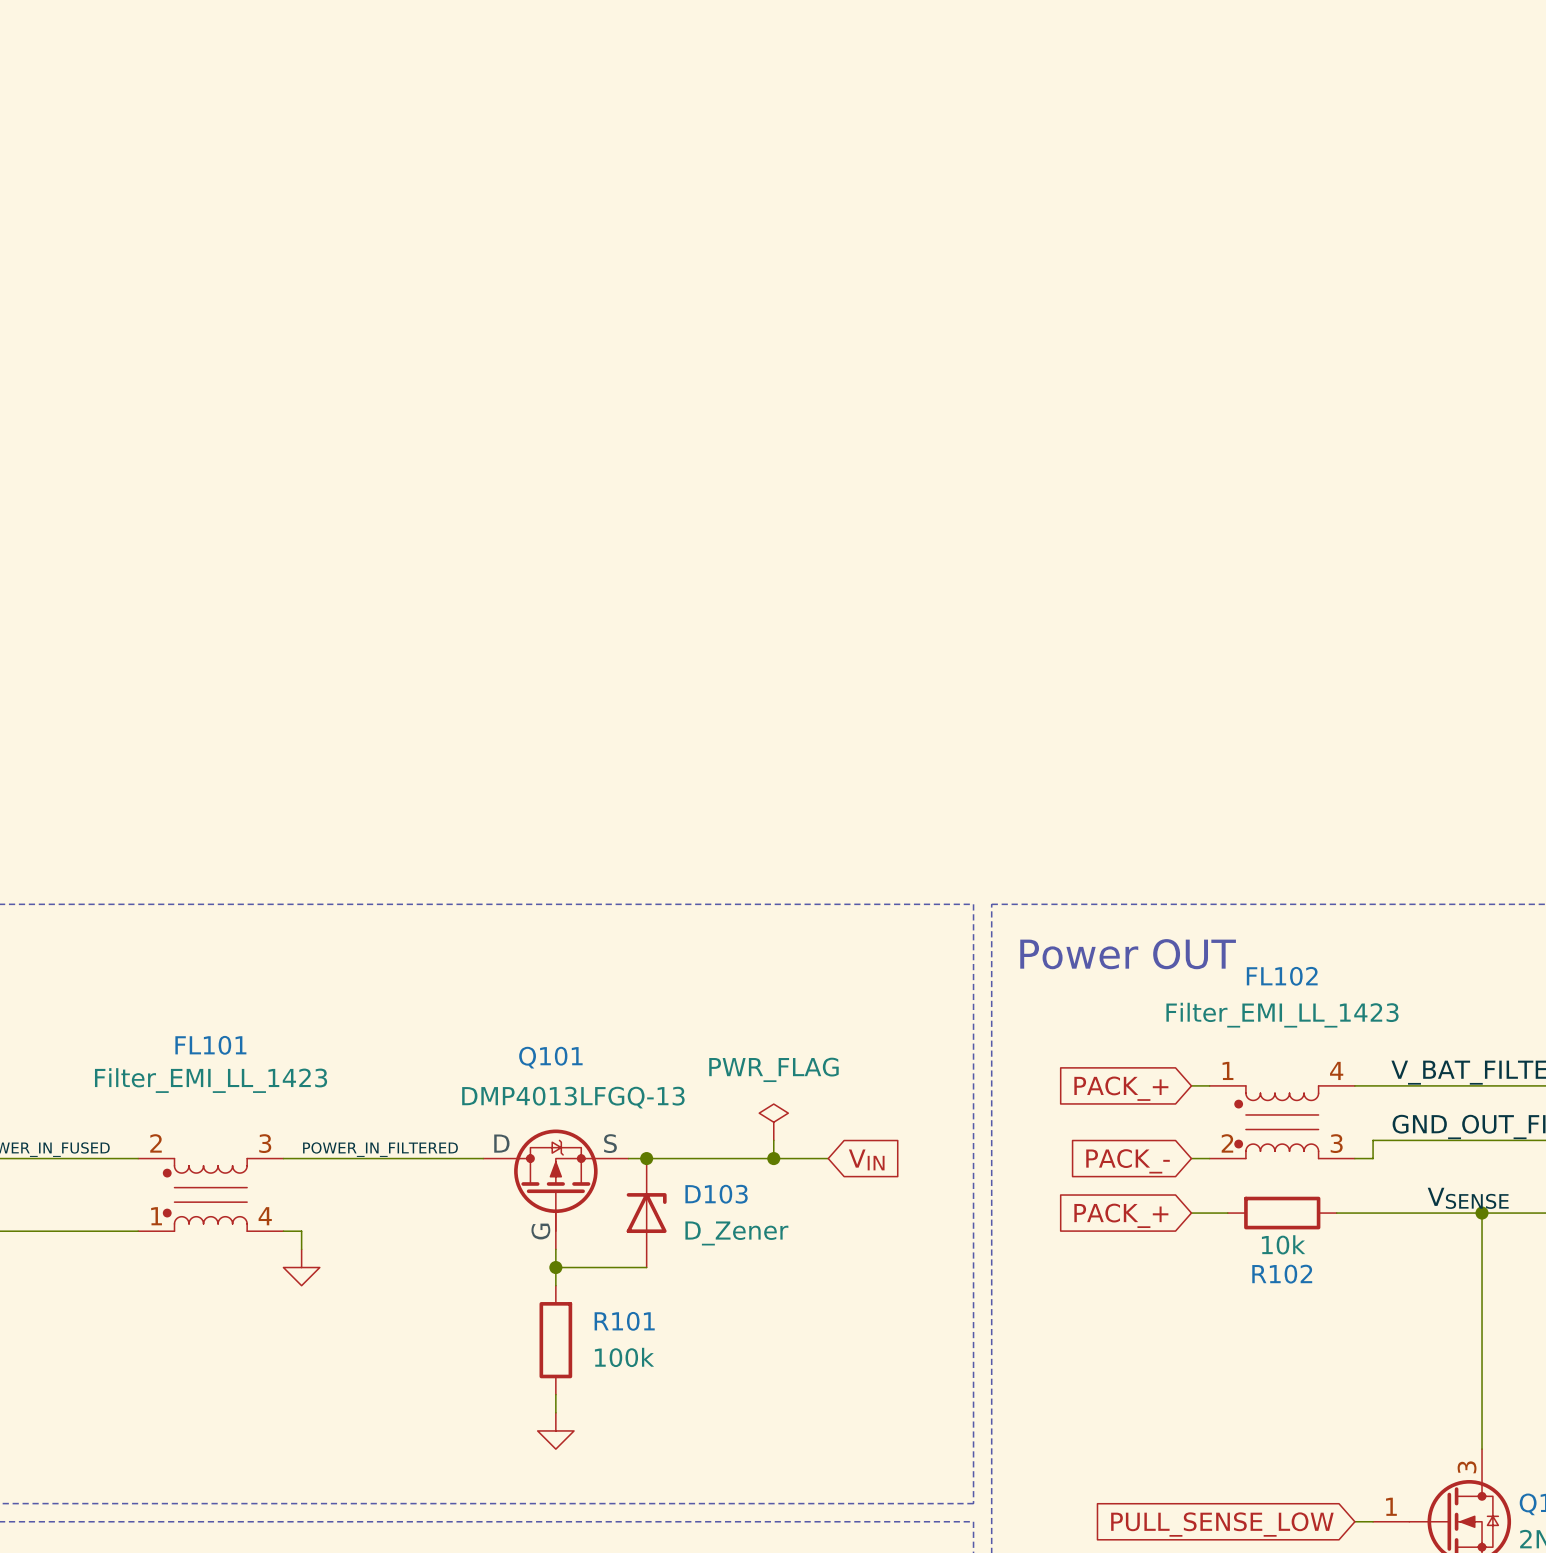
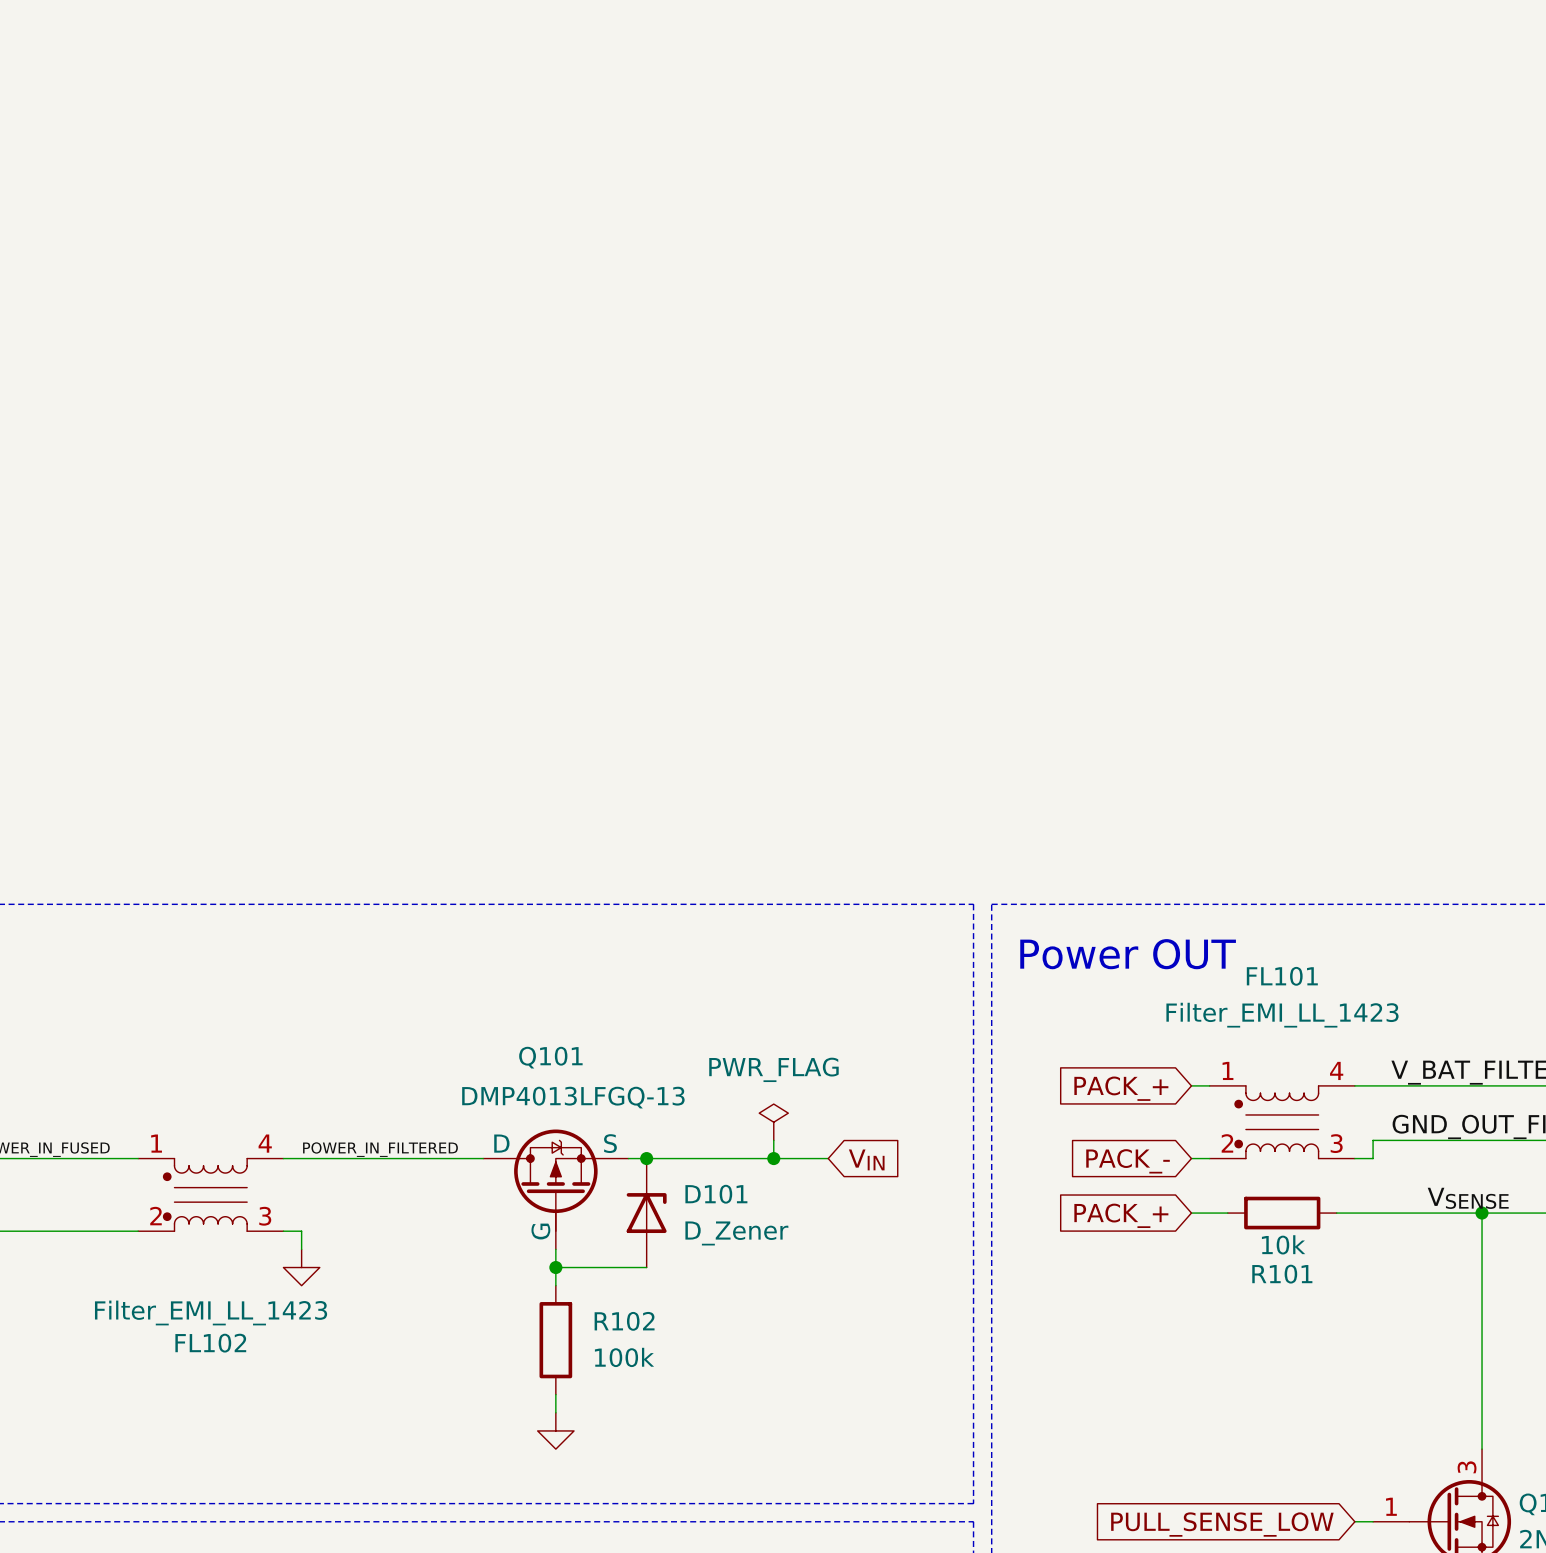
FL102 name: FL102 (1282, 976) -> FL101 (1282, 976)
FL101: Filter_EMI_LL_1423 (210, 1194) -> none
FL102: none -> Filter_EMI_LL_1423 (210, 1194)
D103 name: D103 (716, 1194) -> D101 (716, 1194)
R102 name: R102 (1282, 1274) -> R101 (1282, 1274)
R101 name: R101 (624, 1321) -> R102 (624, 1321)

